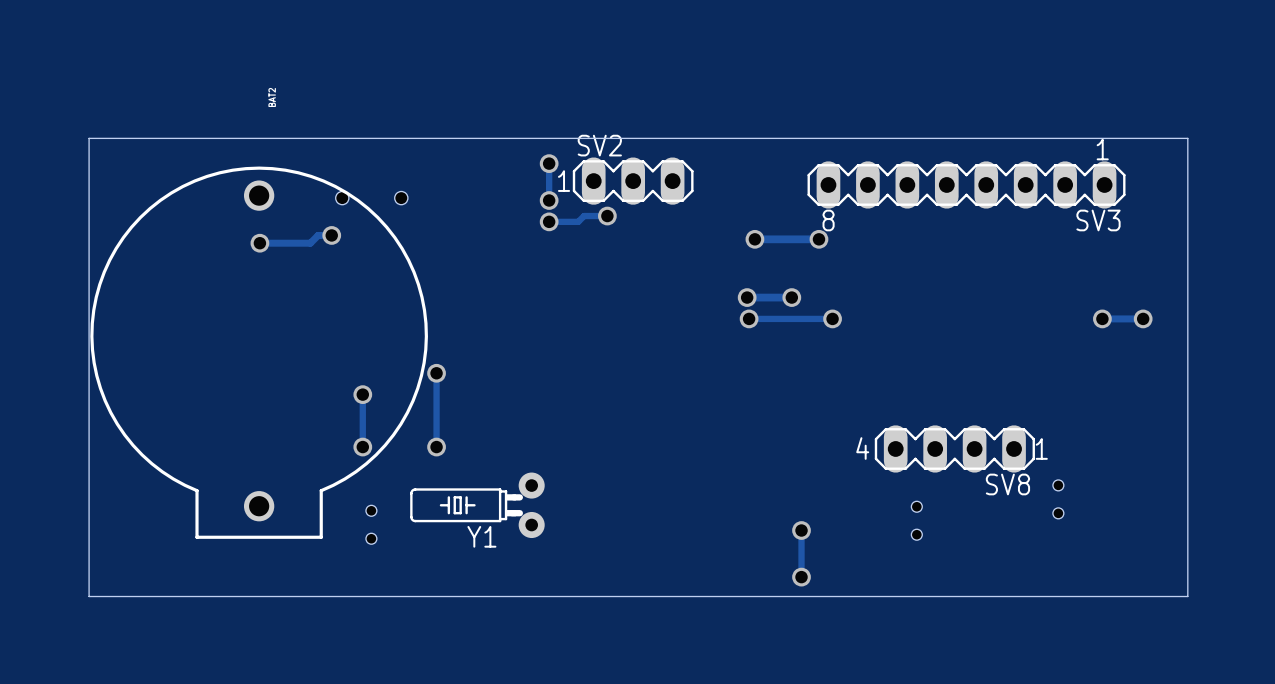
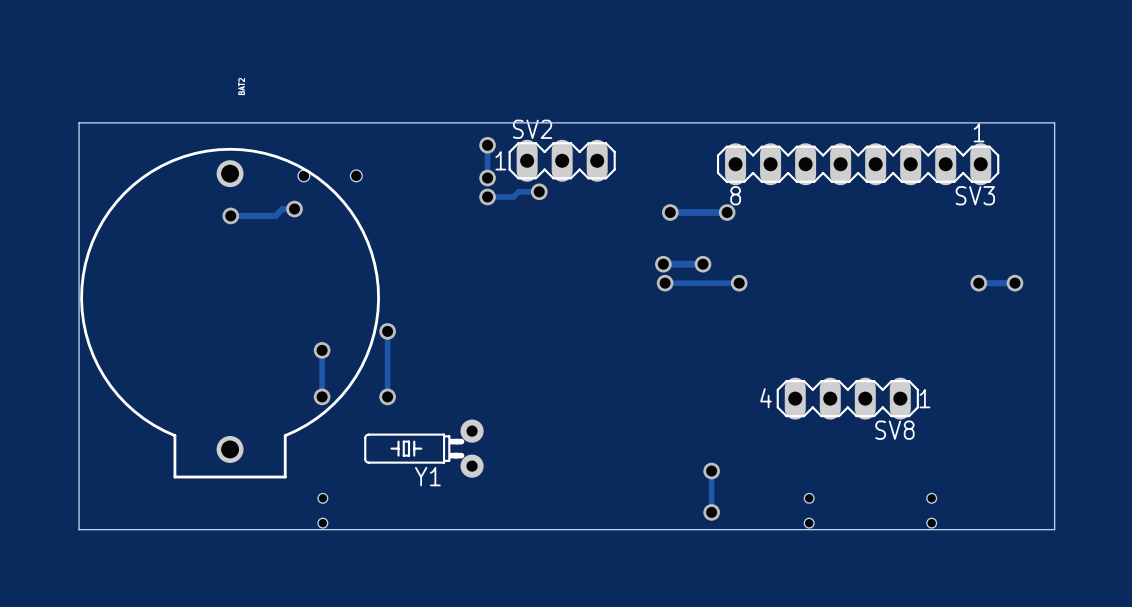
part: (1058, 499) -> none
part position: (916, 520) -> (809, 510)
part position: (371, 524) -> (322, 510)
part: none -> (931, 510)

